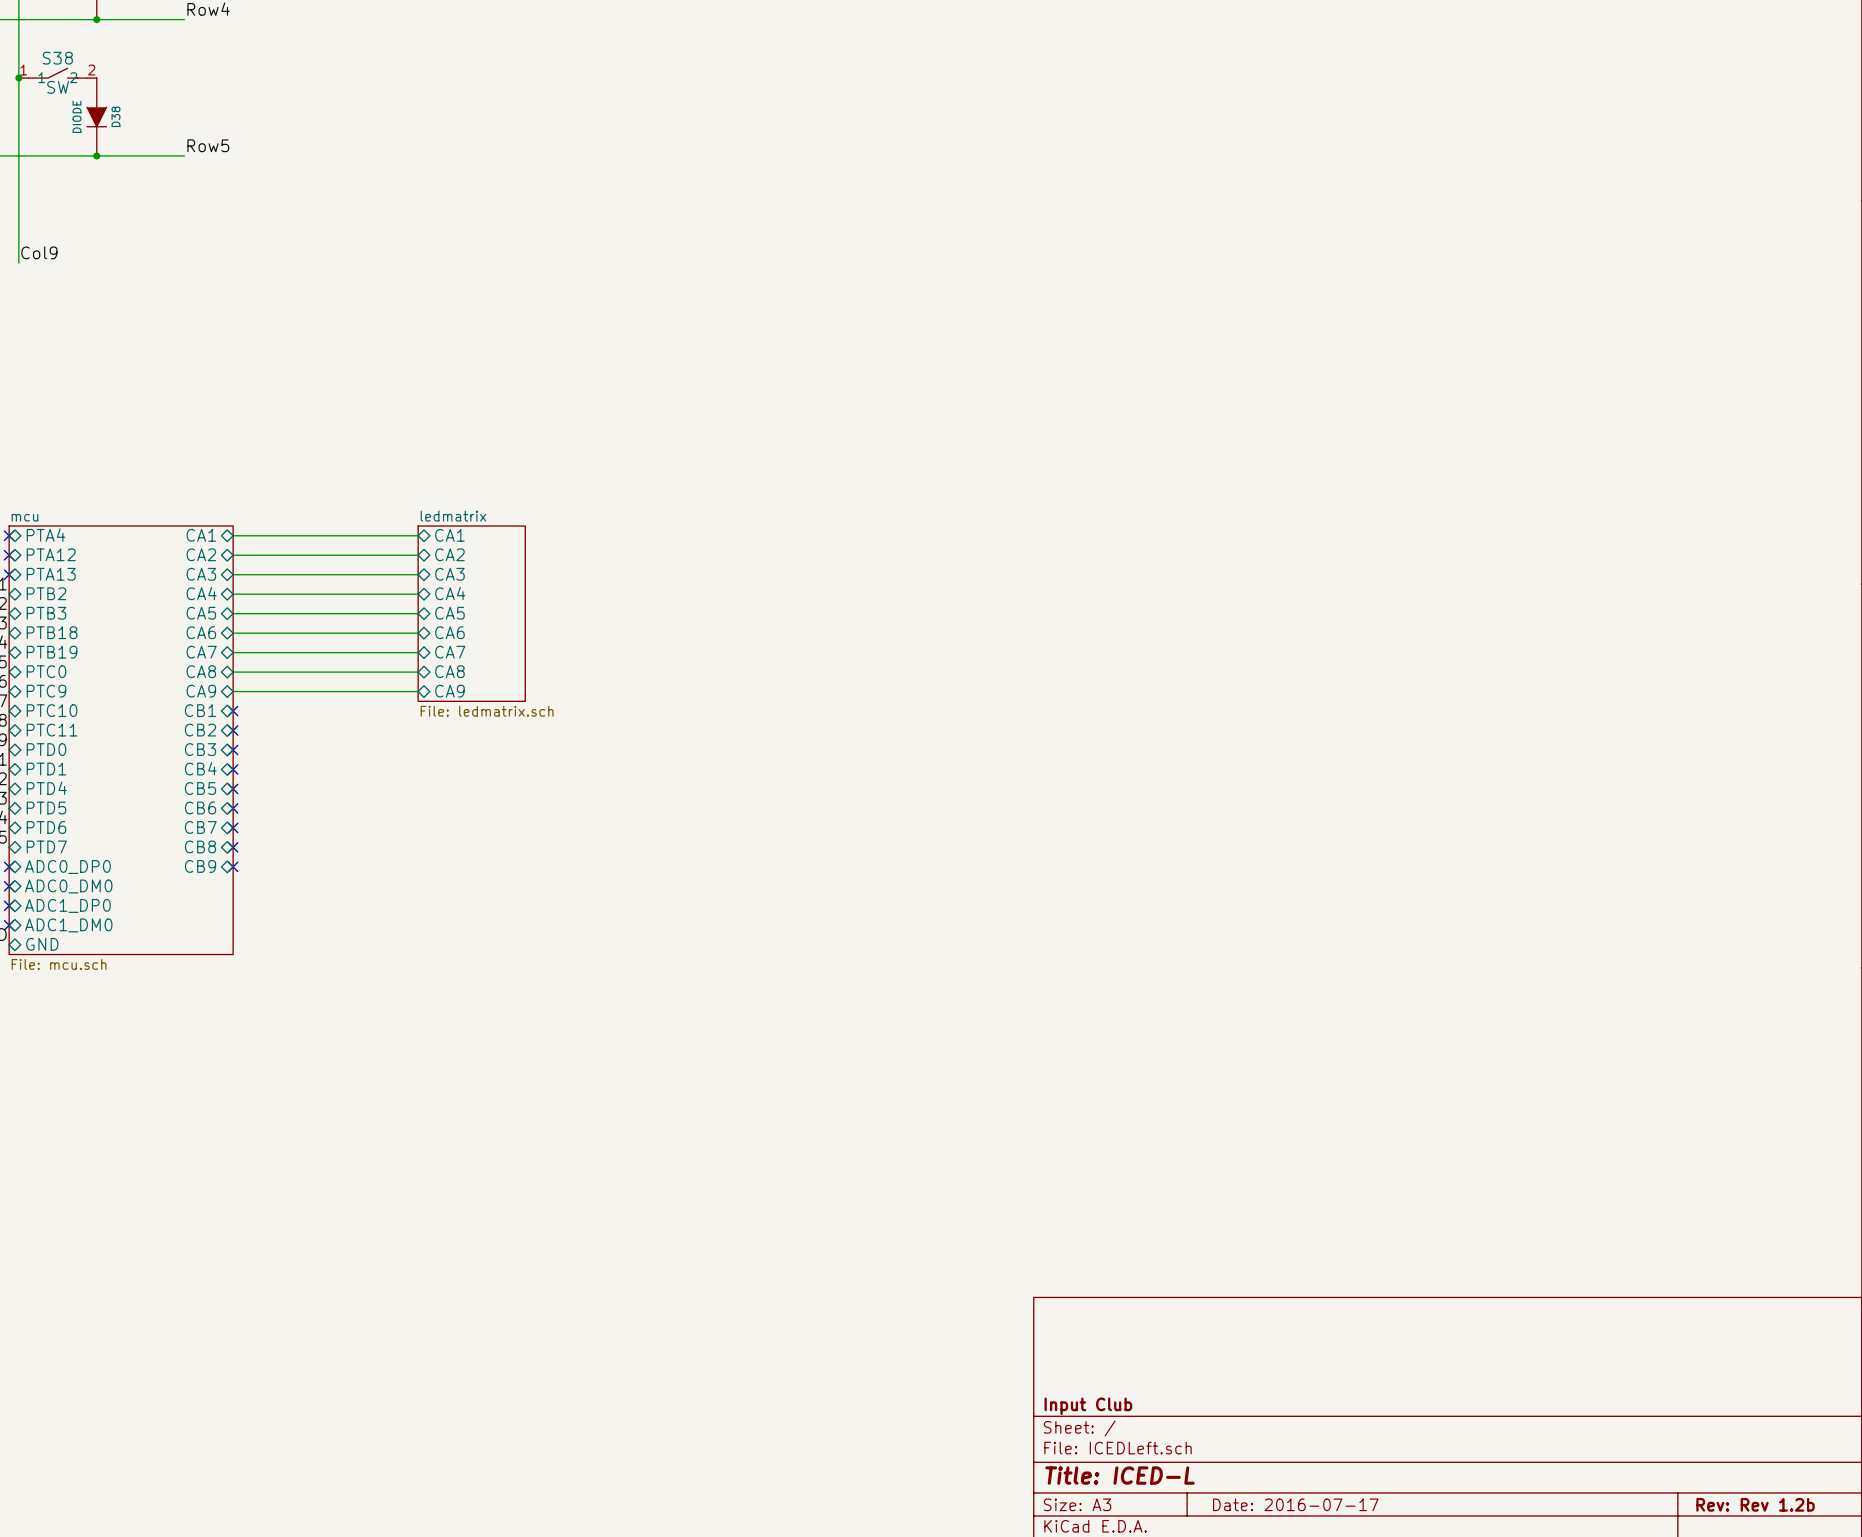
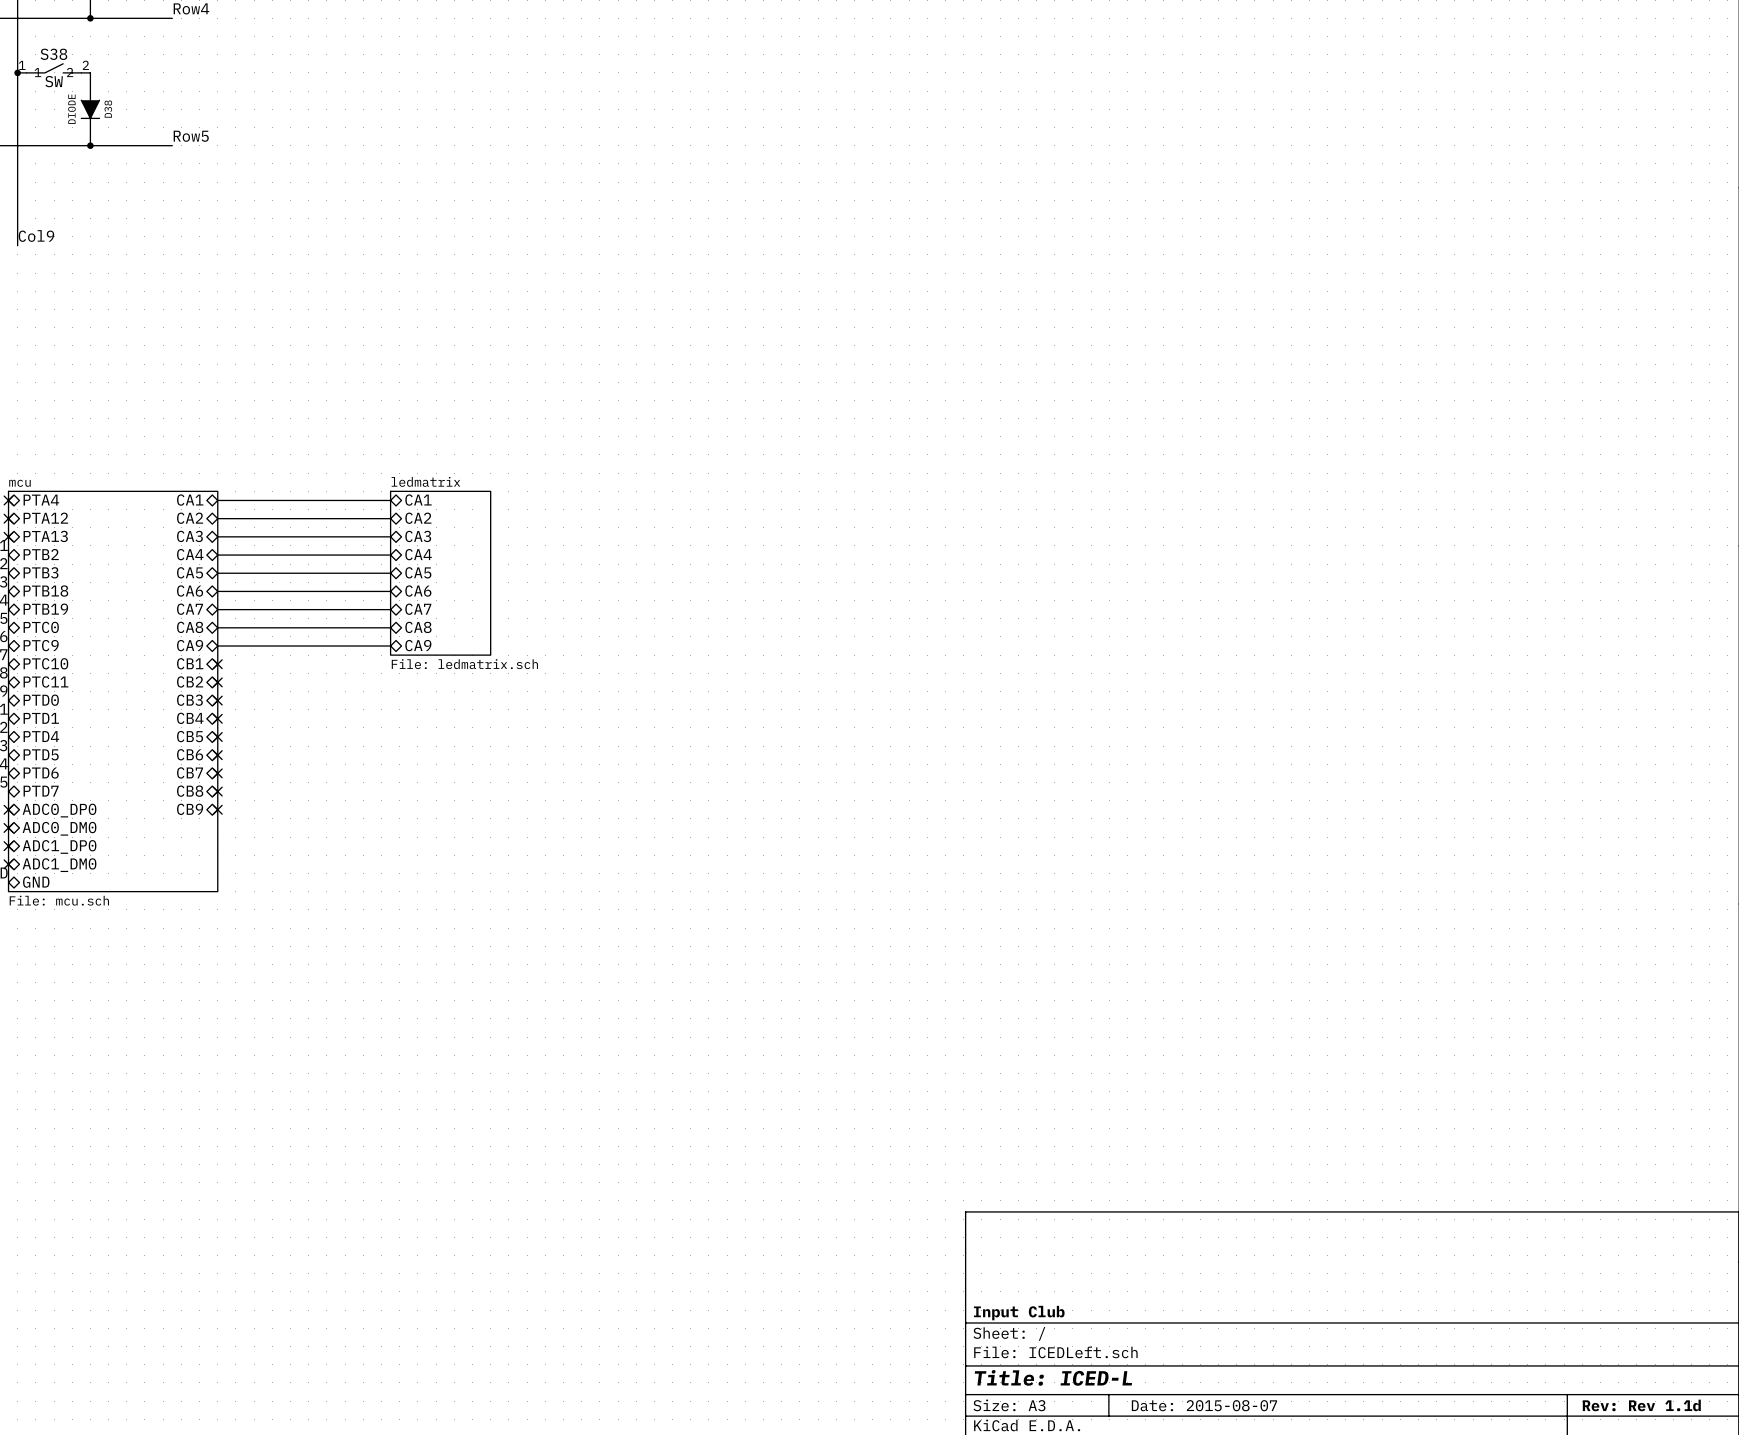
title block: Date: 2016-07-17 (1295, 1504) -> Date: 2015-08-07 (1204, 1405)
title block: Rev: Rev 1.2b (1755, 1504) -> Rev: Rev 1.1d (1641, 1405)

